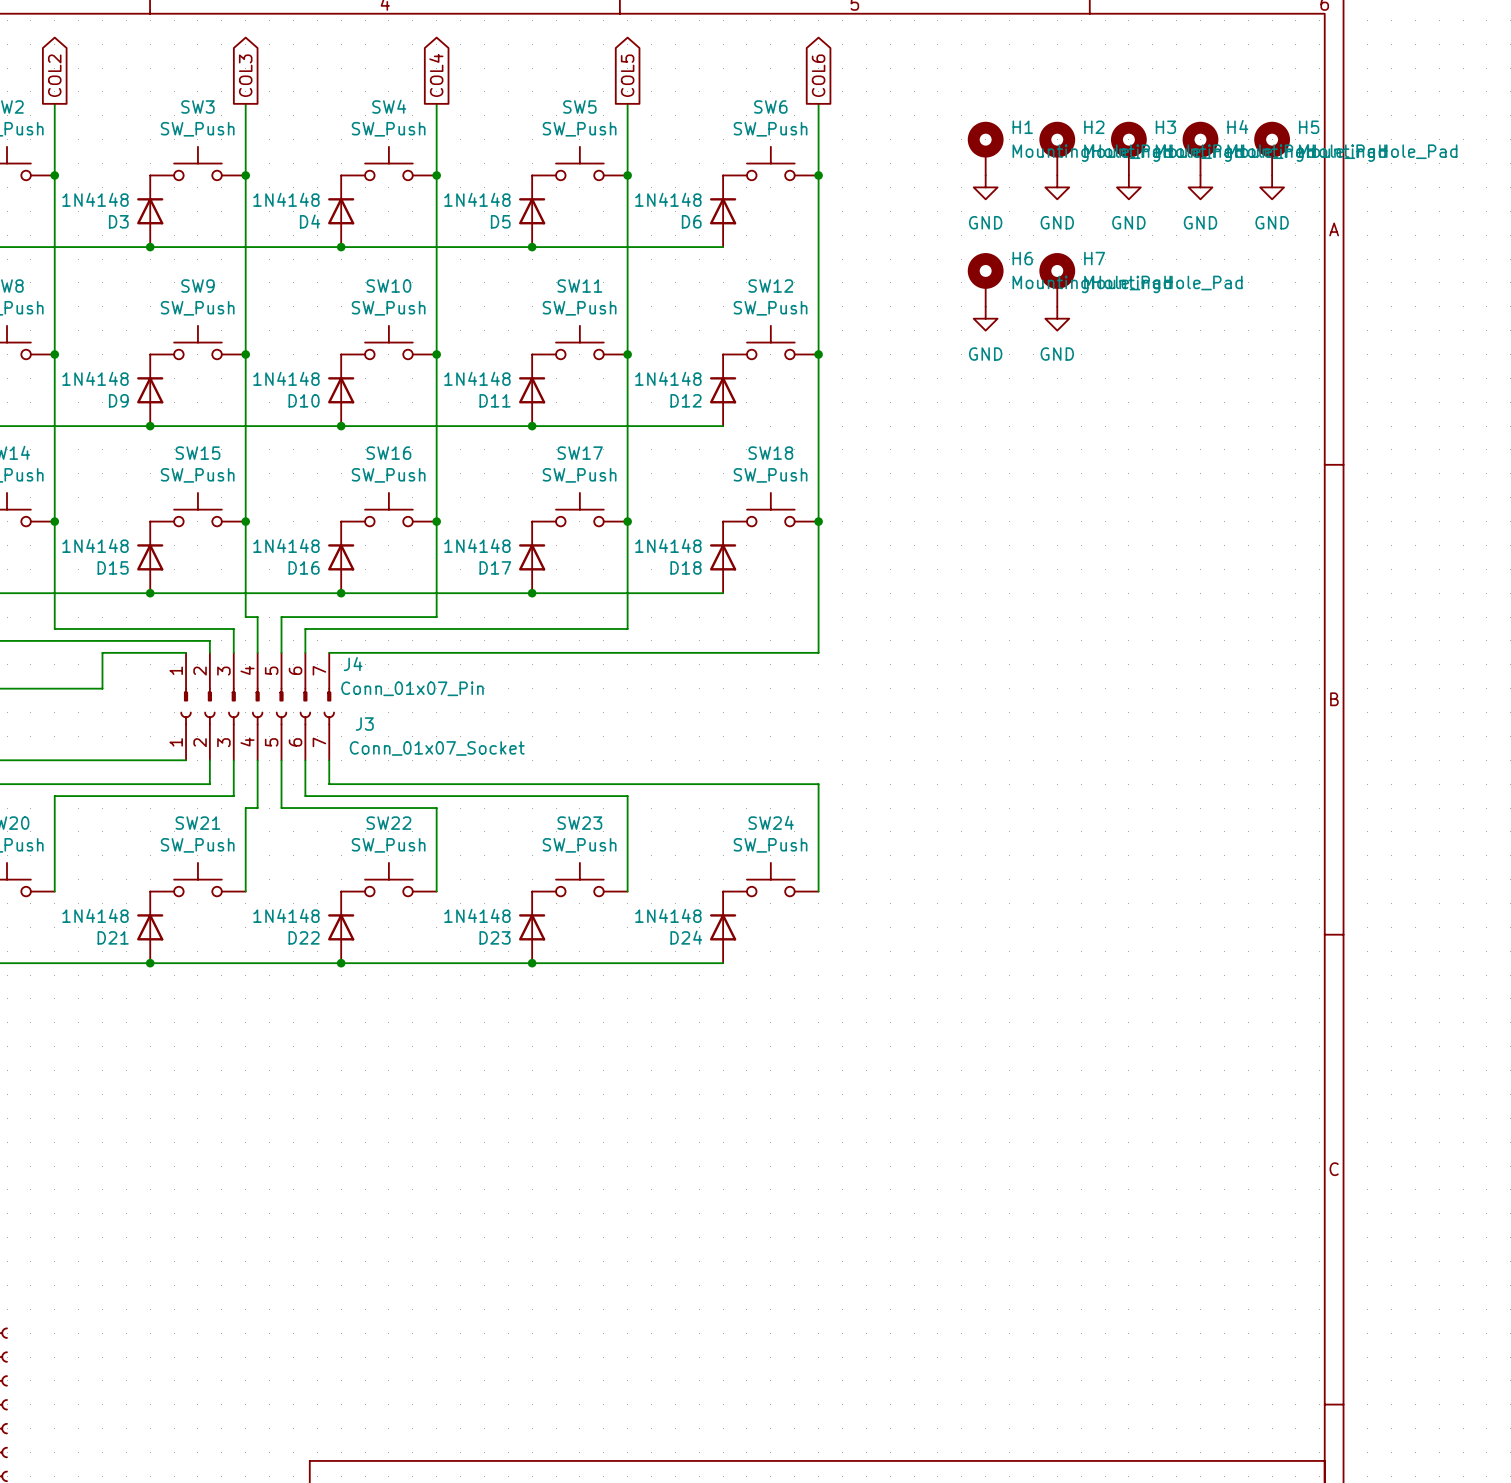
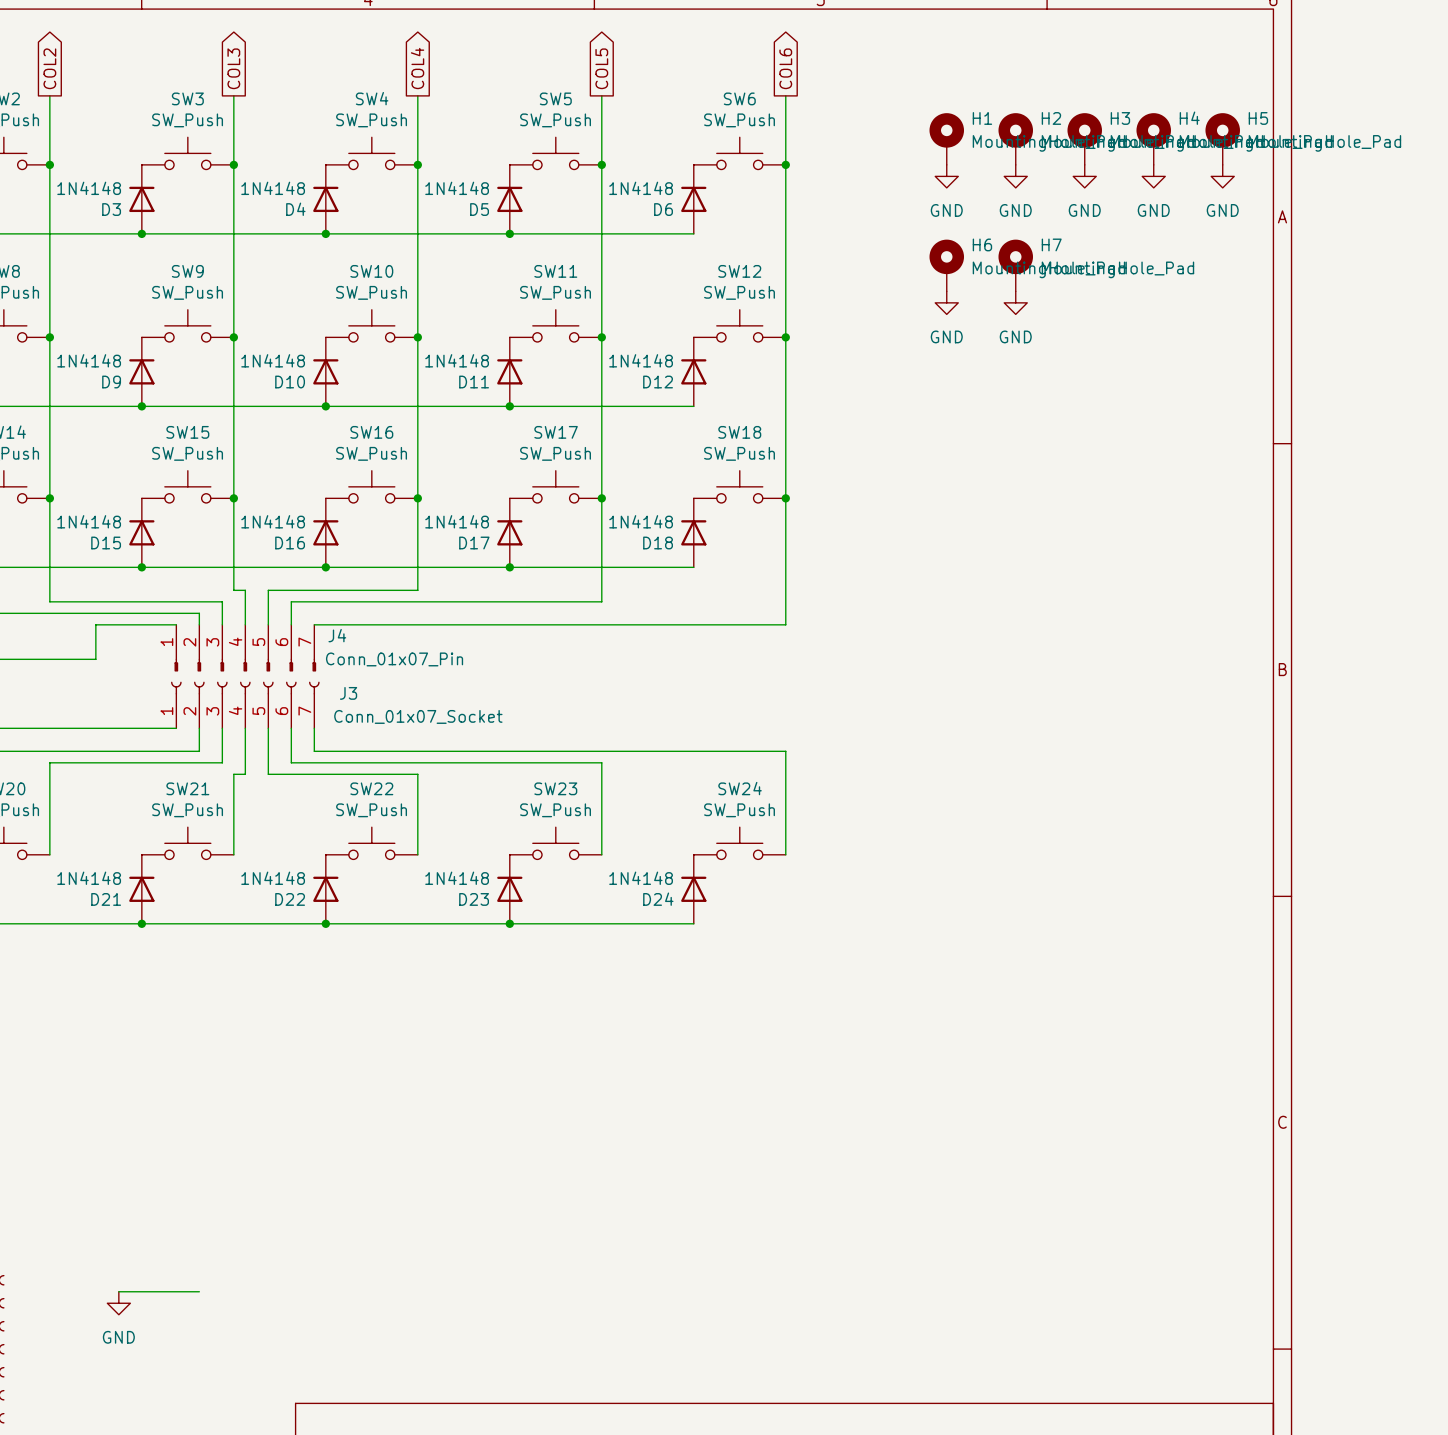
wire: none -> (118, 1291) (199, 1291)
power symbol: none -> GND (118, 1303)

